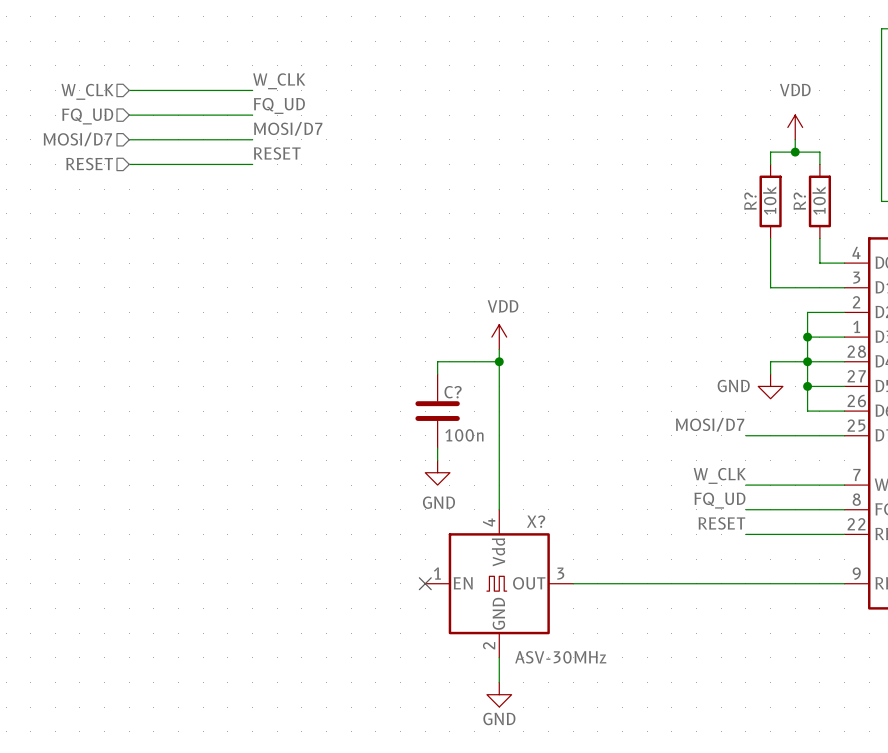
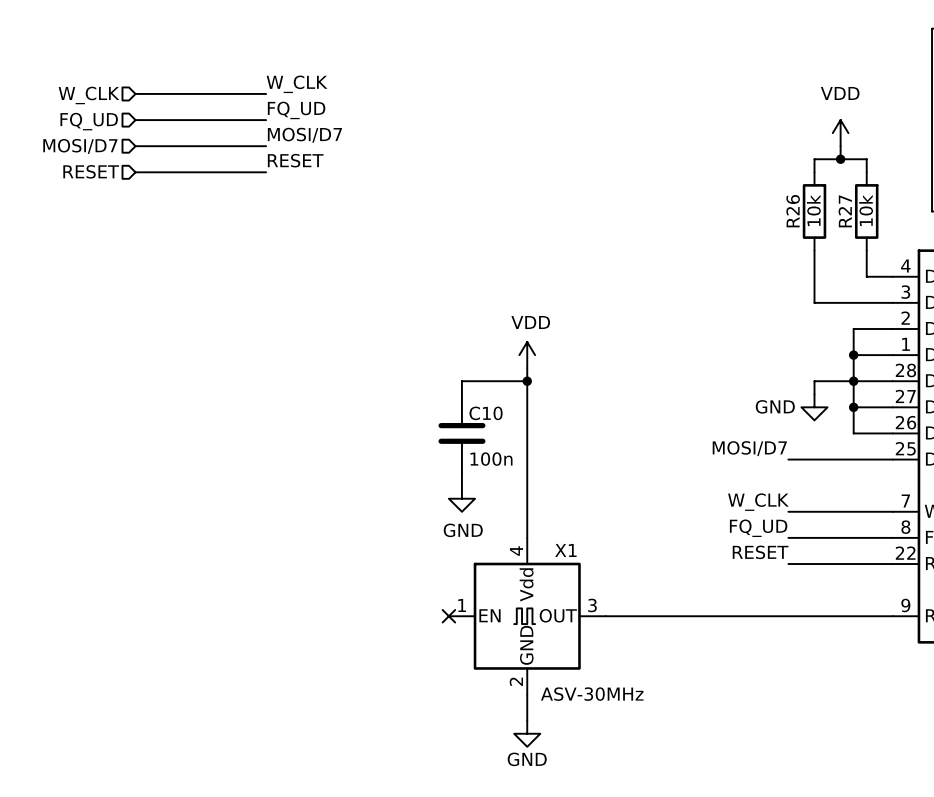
R? name: R? (750, 201) -> R26 (793, 211)
R? name: R? (799, 201) -> R27 (845, 211)
C? name: C? (453, 392) -> C10 (486, 413)
X? name: X? (536, 521) -> X1 (565, 550)

